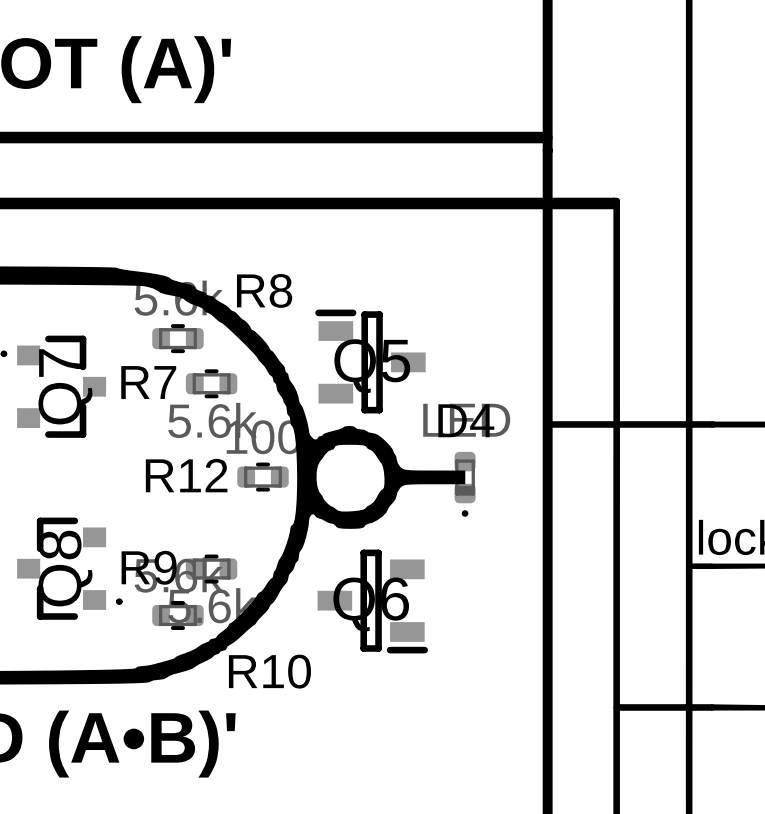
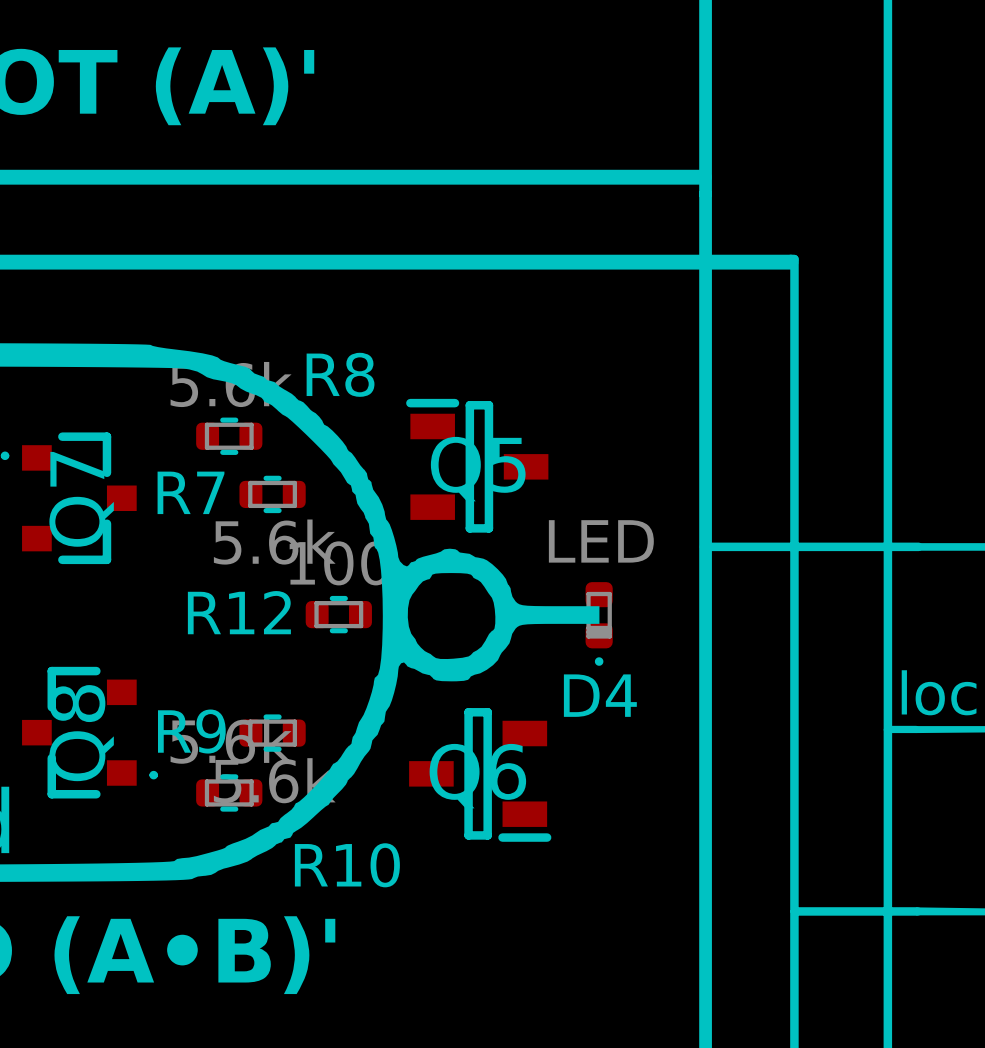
D4 name position: D4 (466, 420) -> D4 (600, 695)

